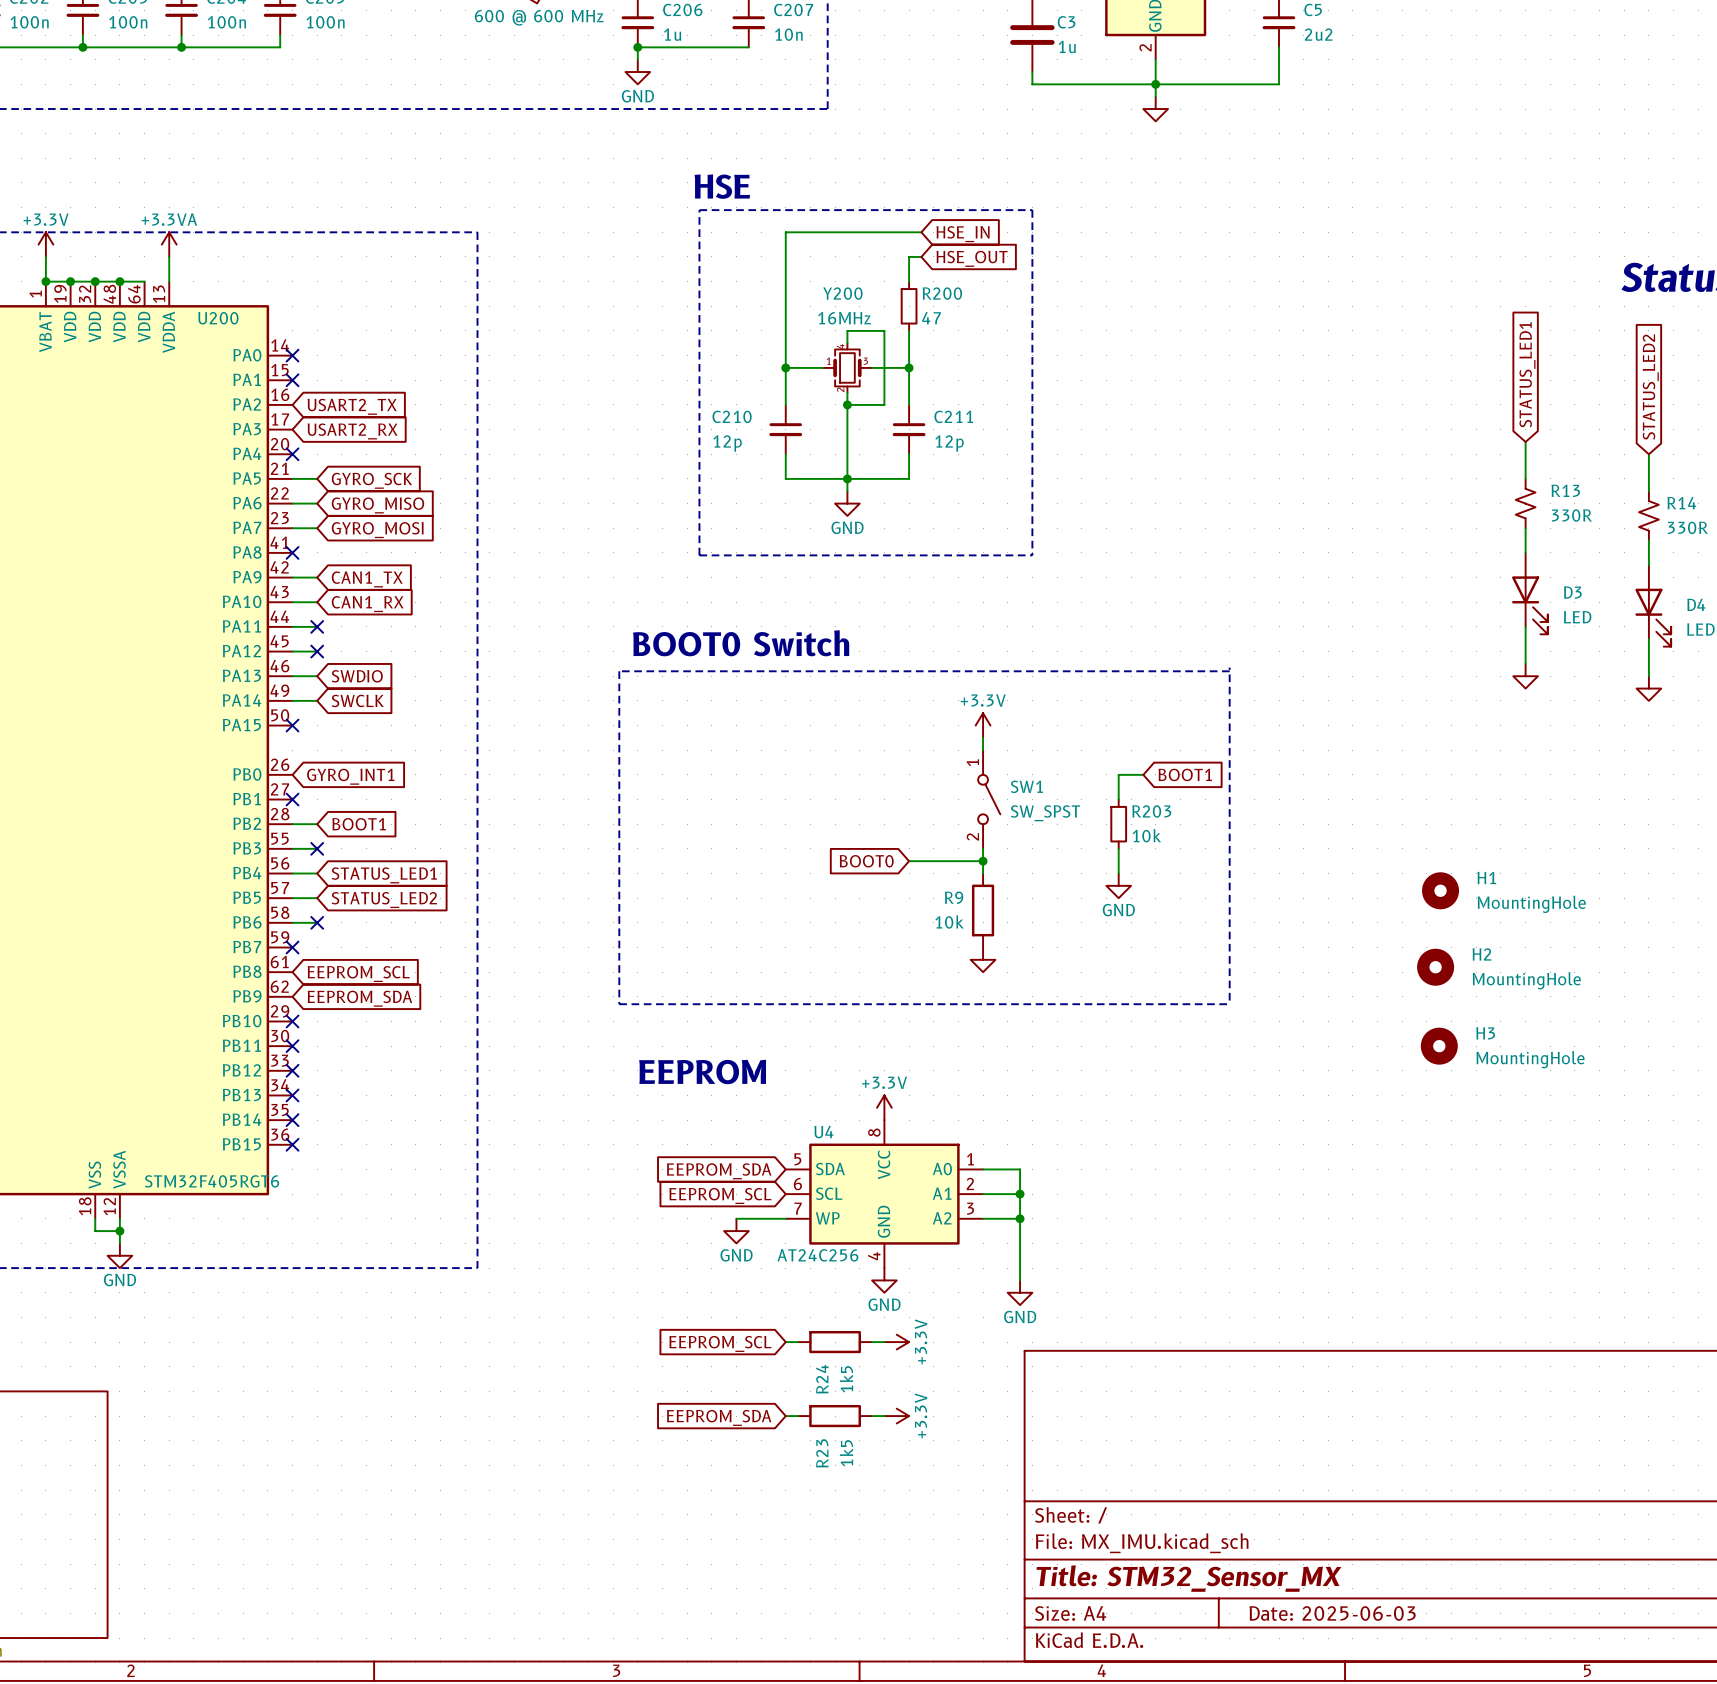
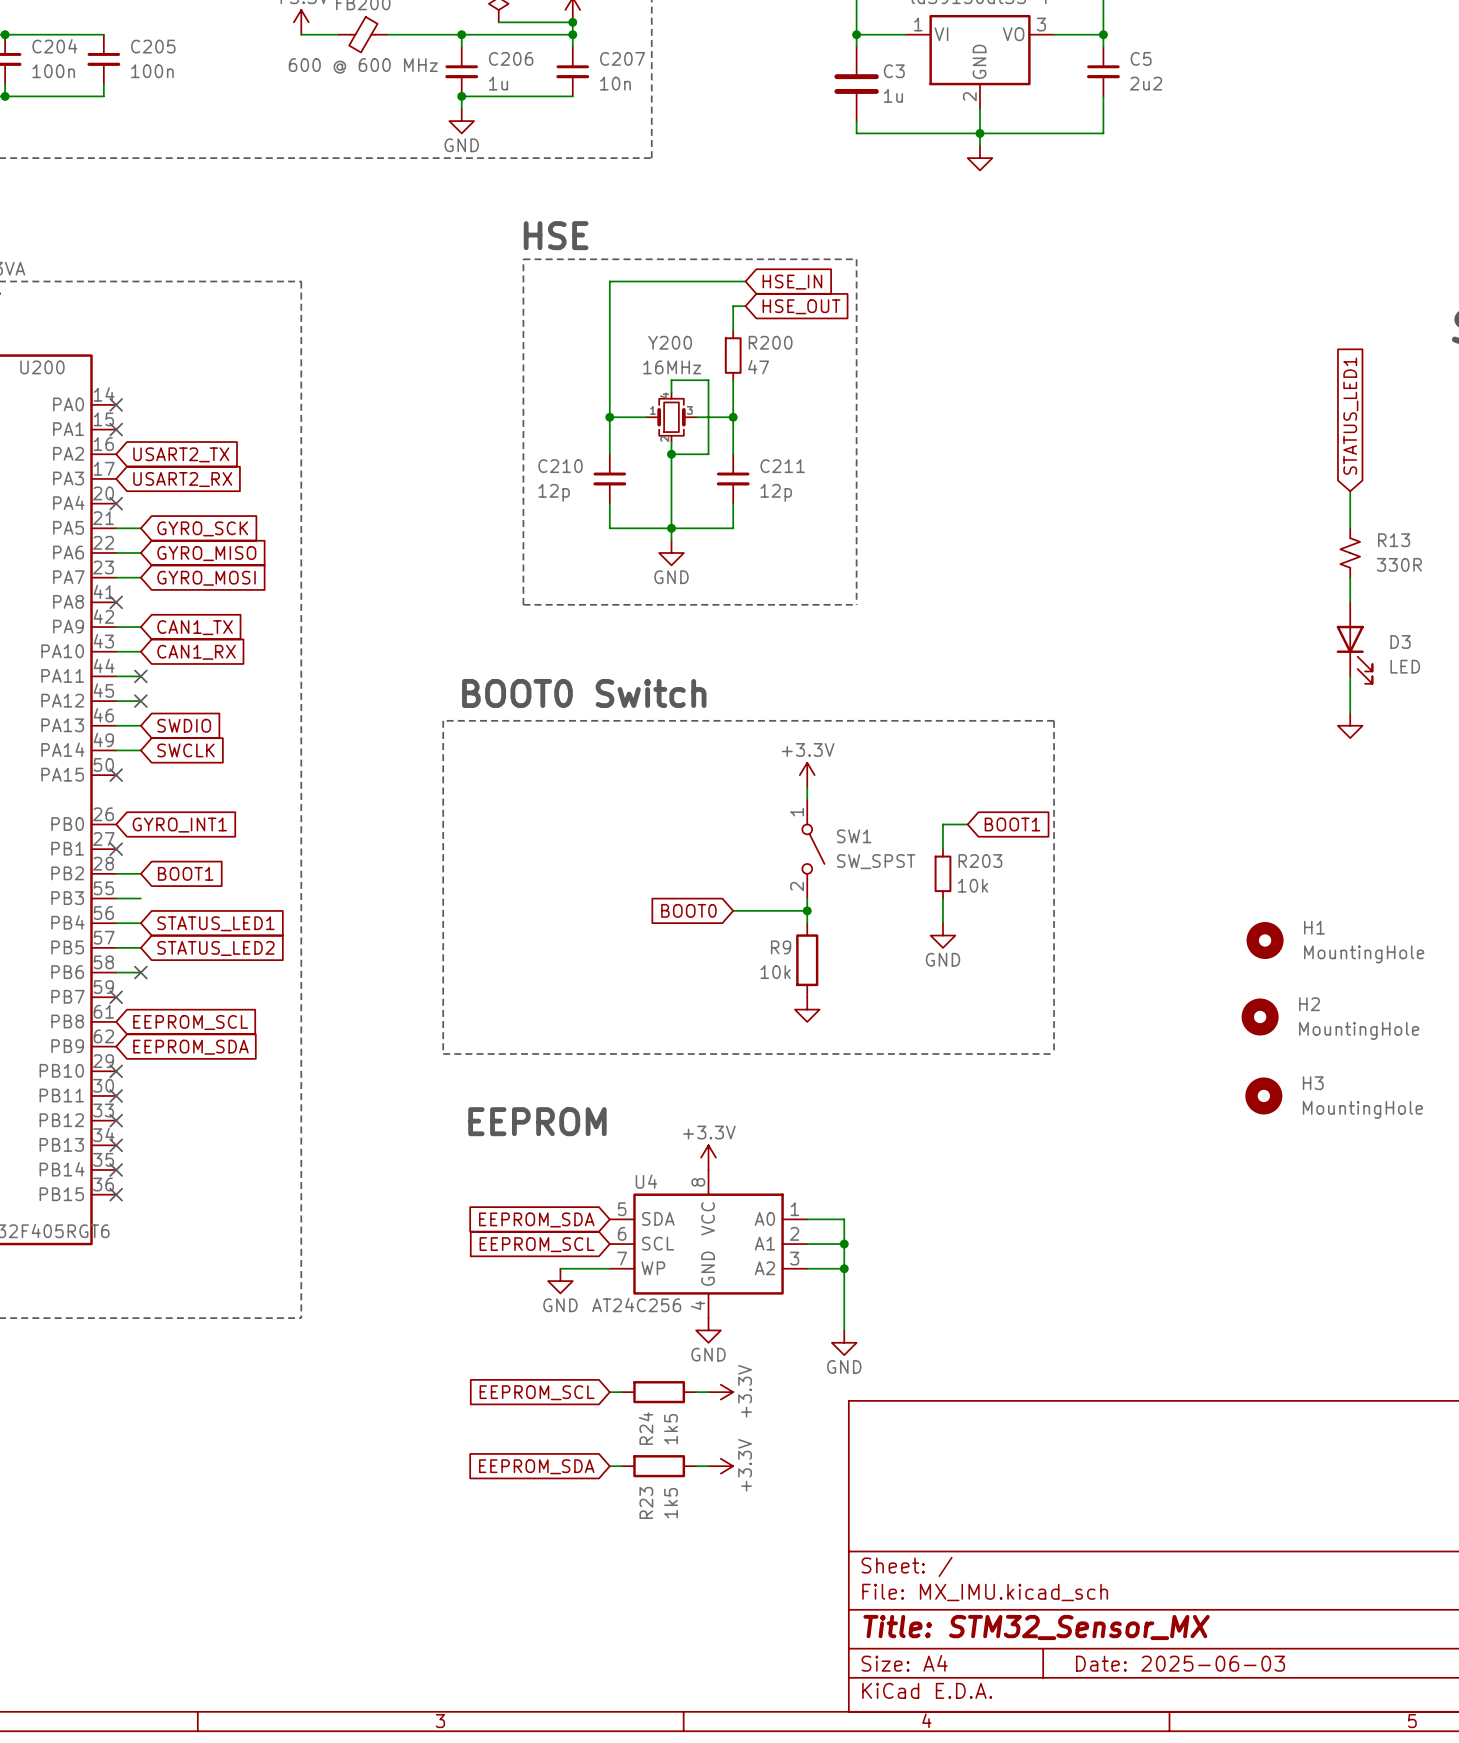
no-connect mark: (317, 848) -> none

